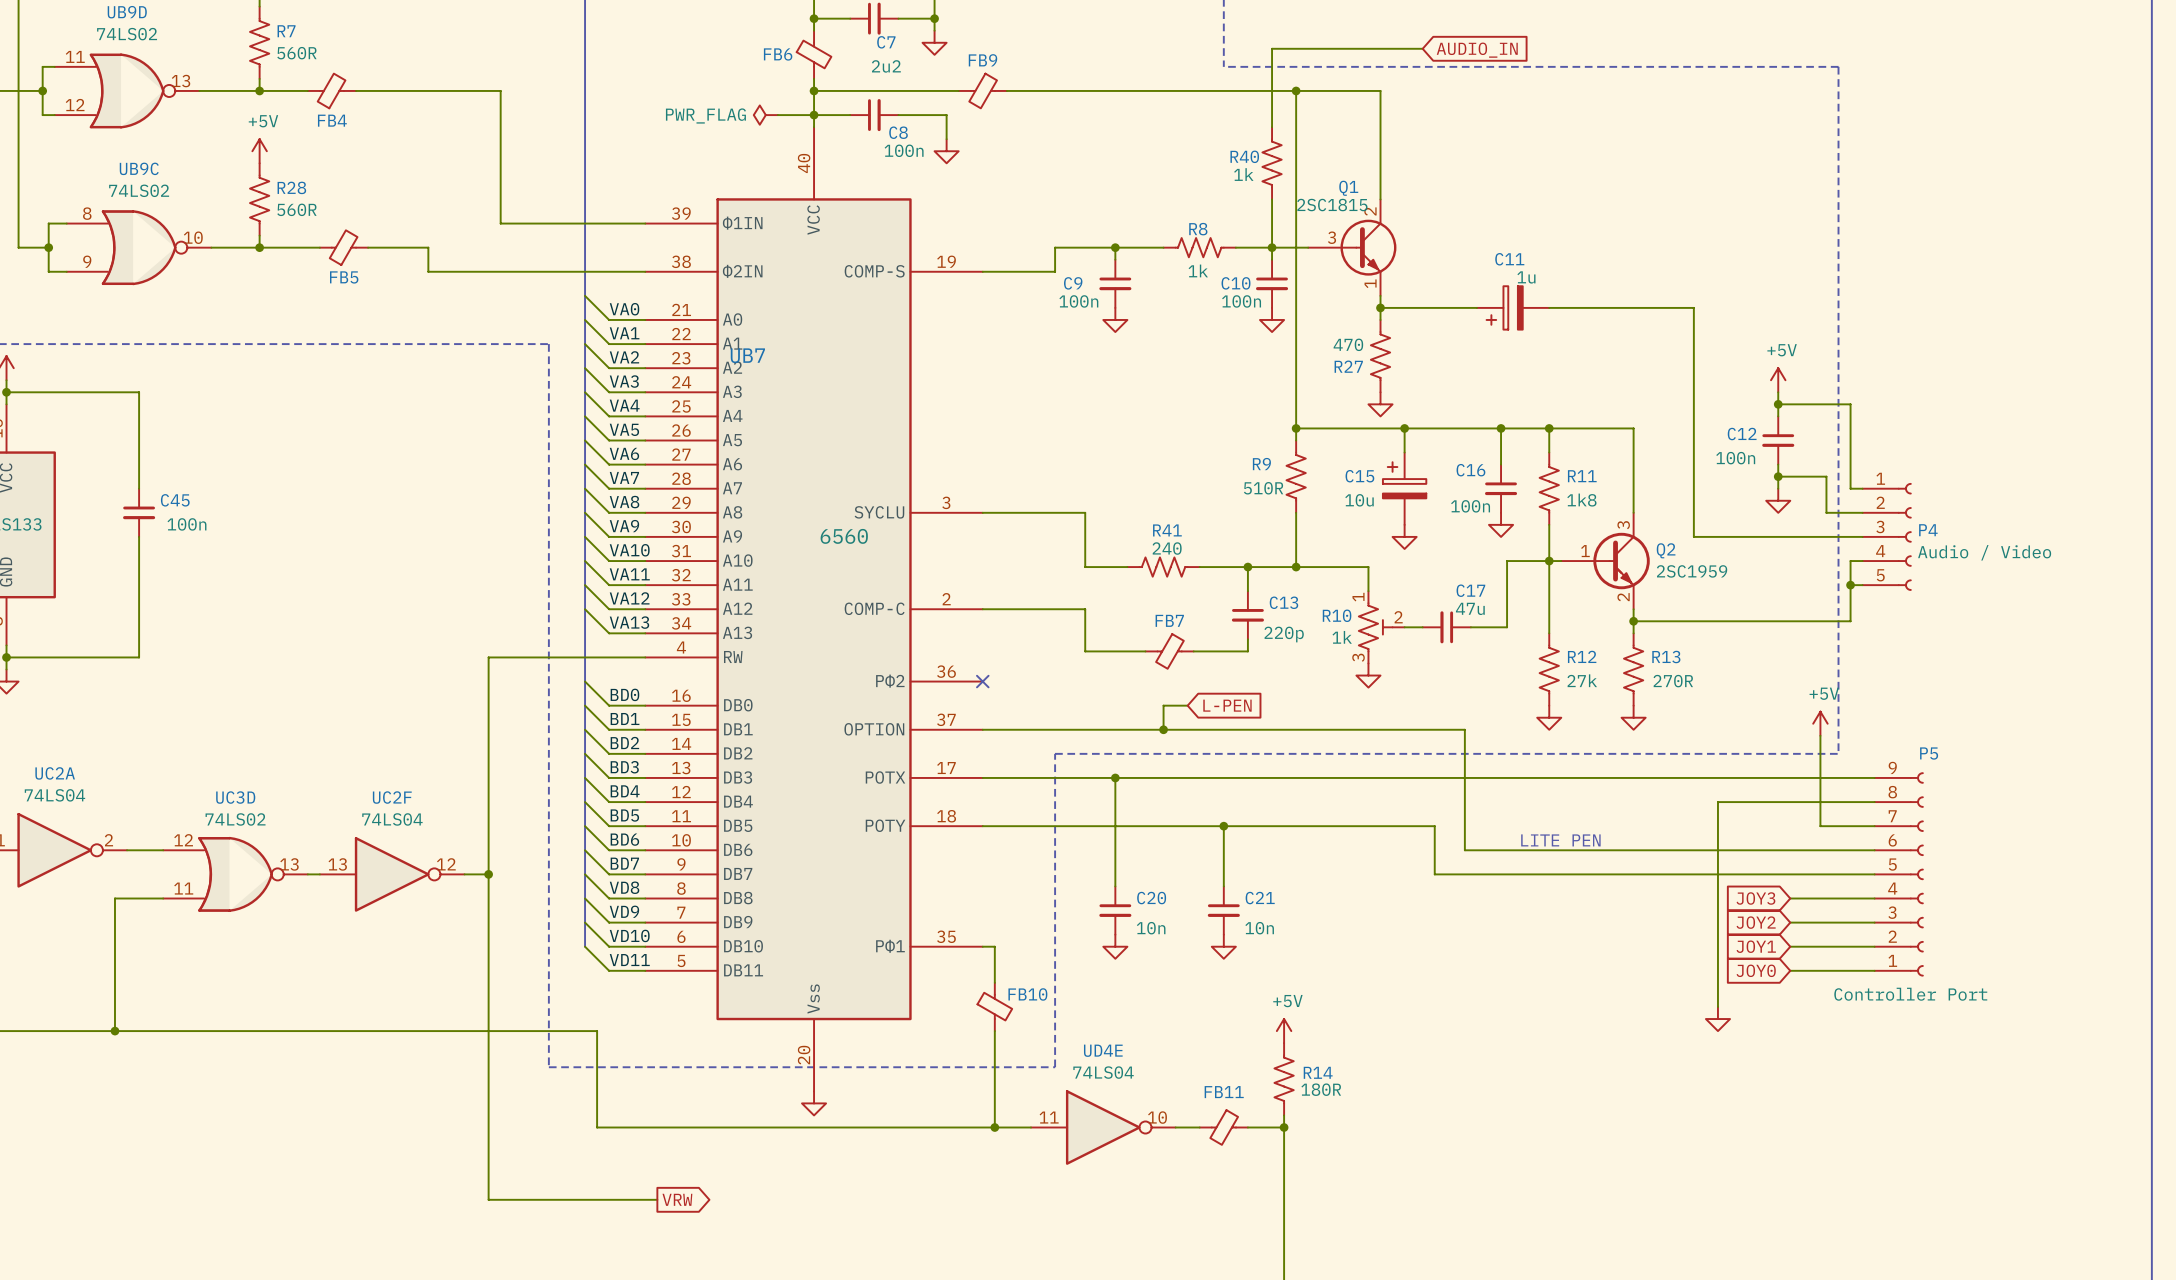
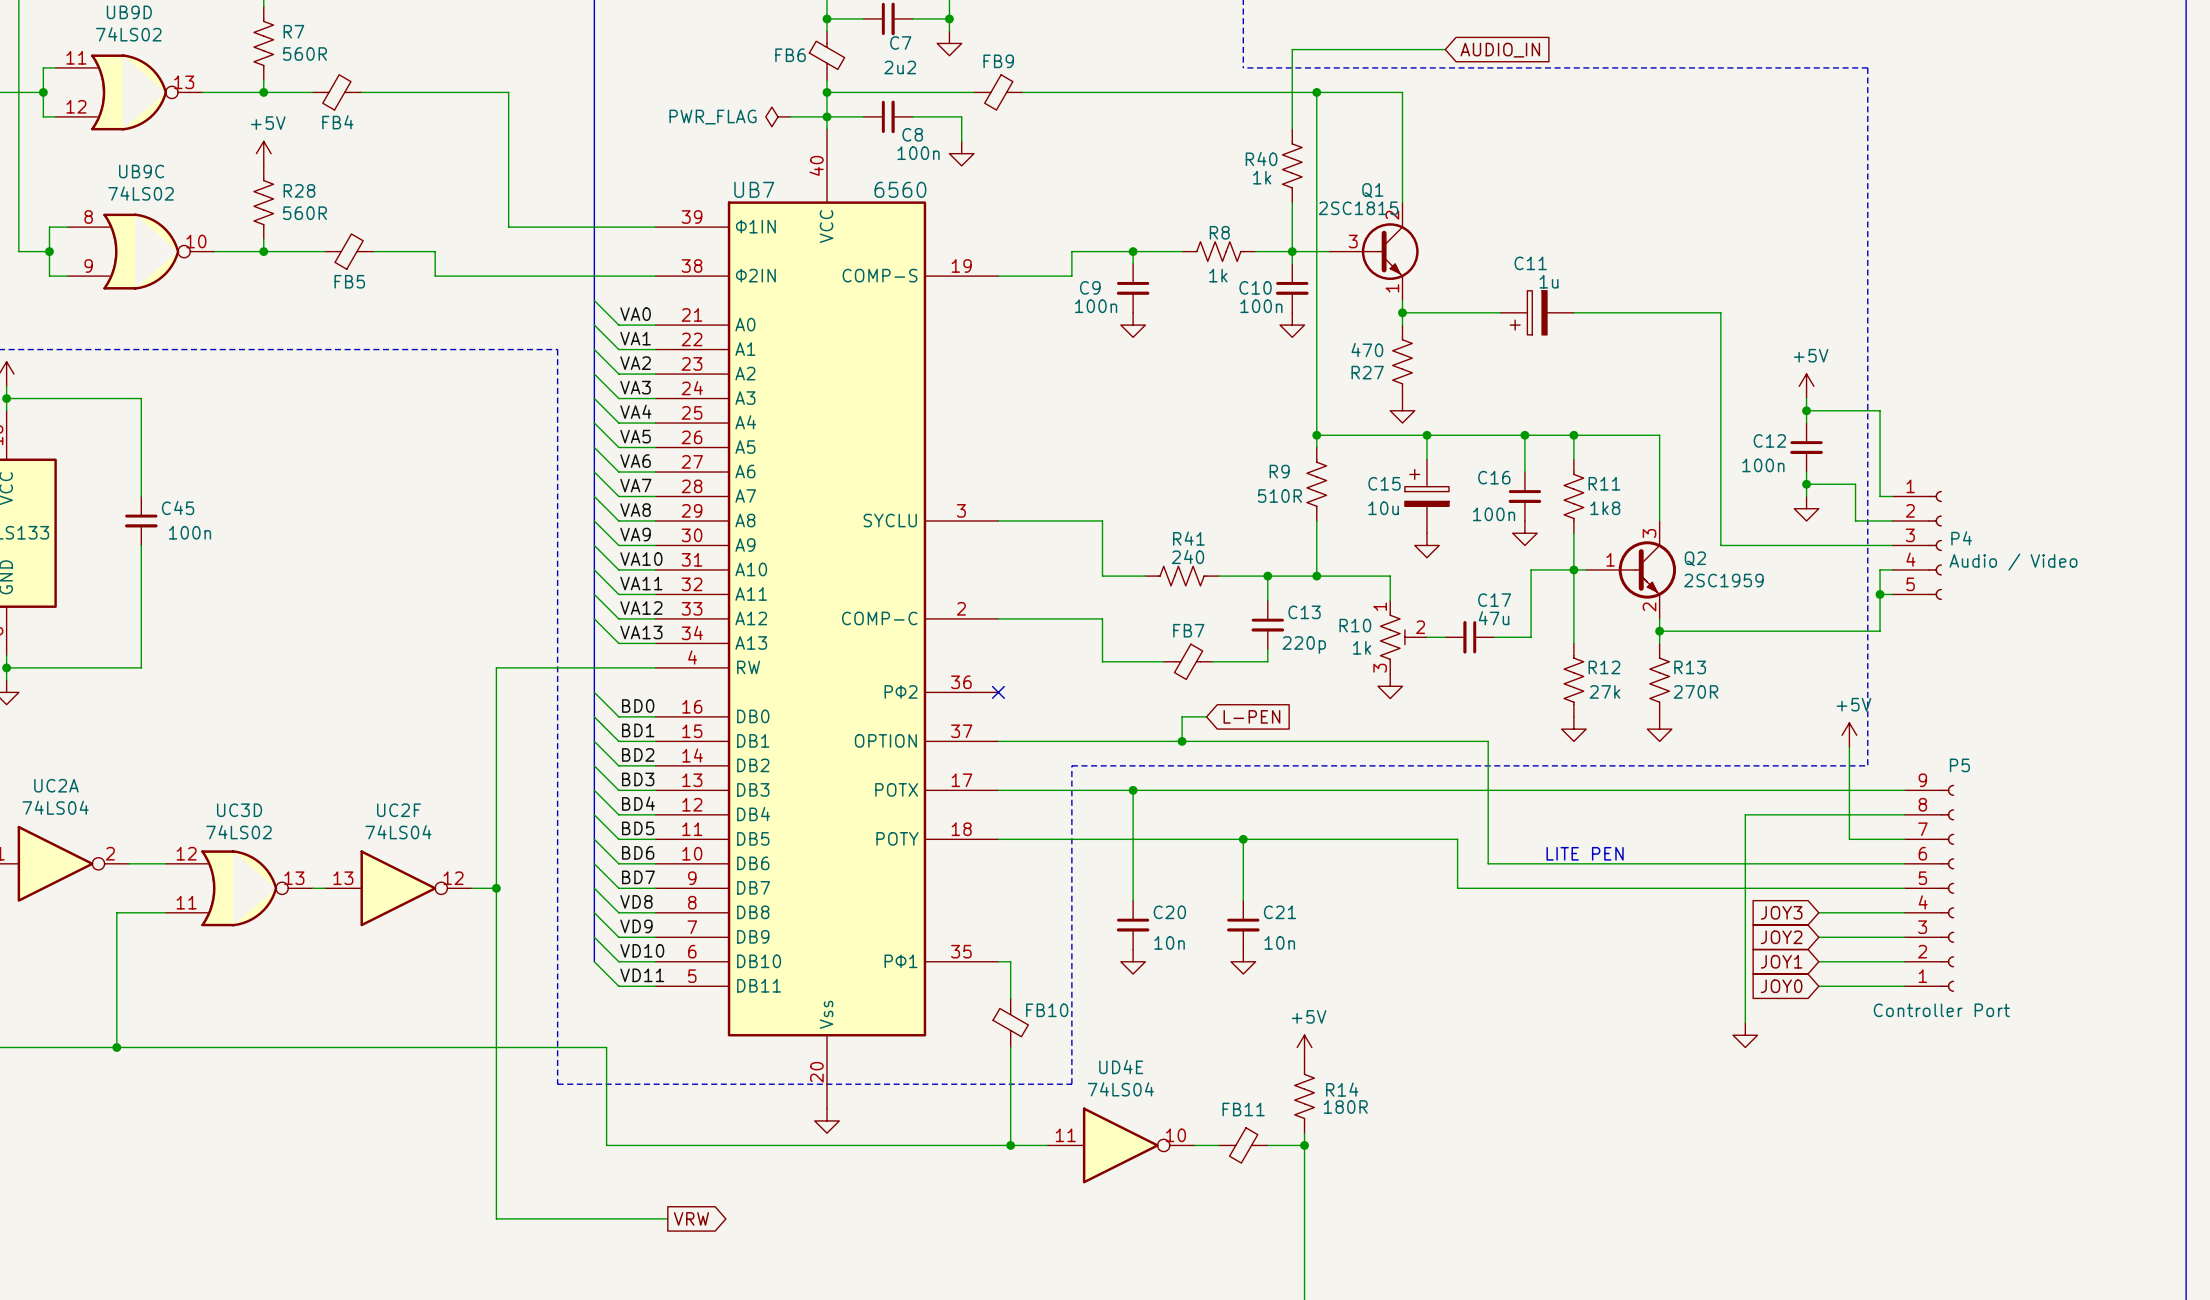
UB7 name position: UB7 (747, 355) -> UB7 (754, 189)
UB7 value position: 6560 (844, 536) -> 6560 (900, 189)

